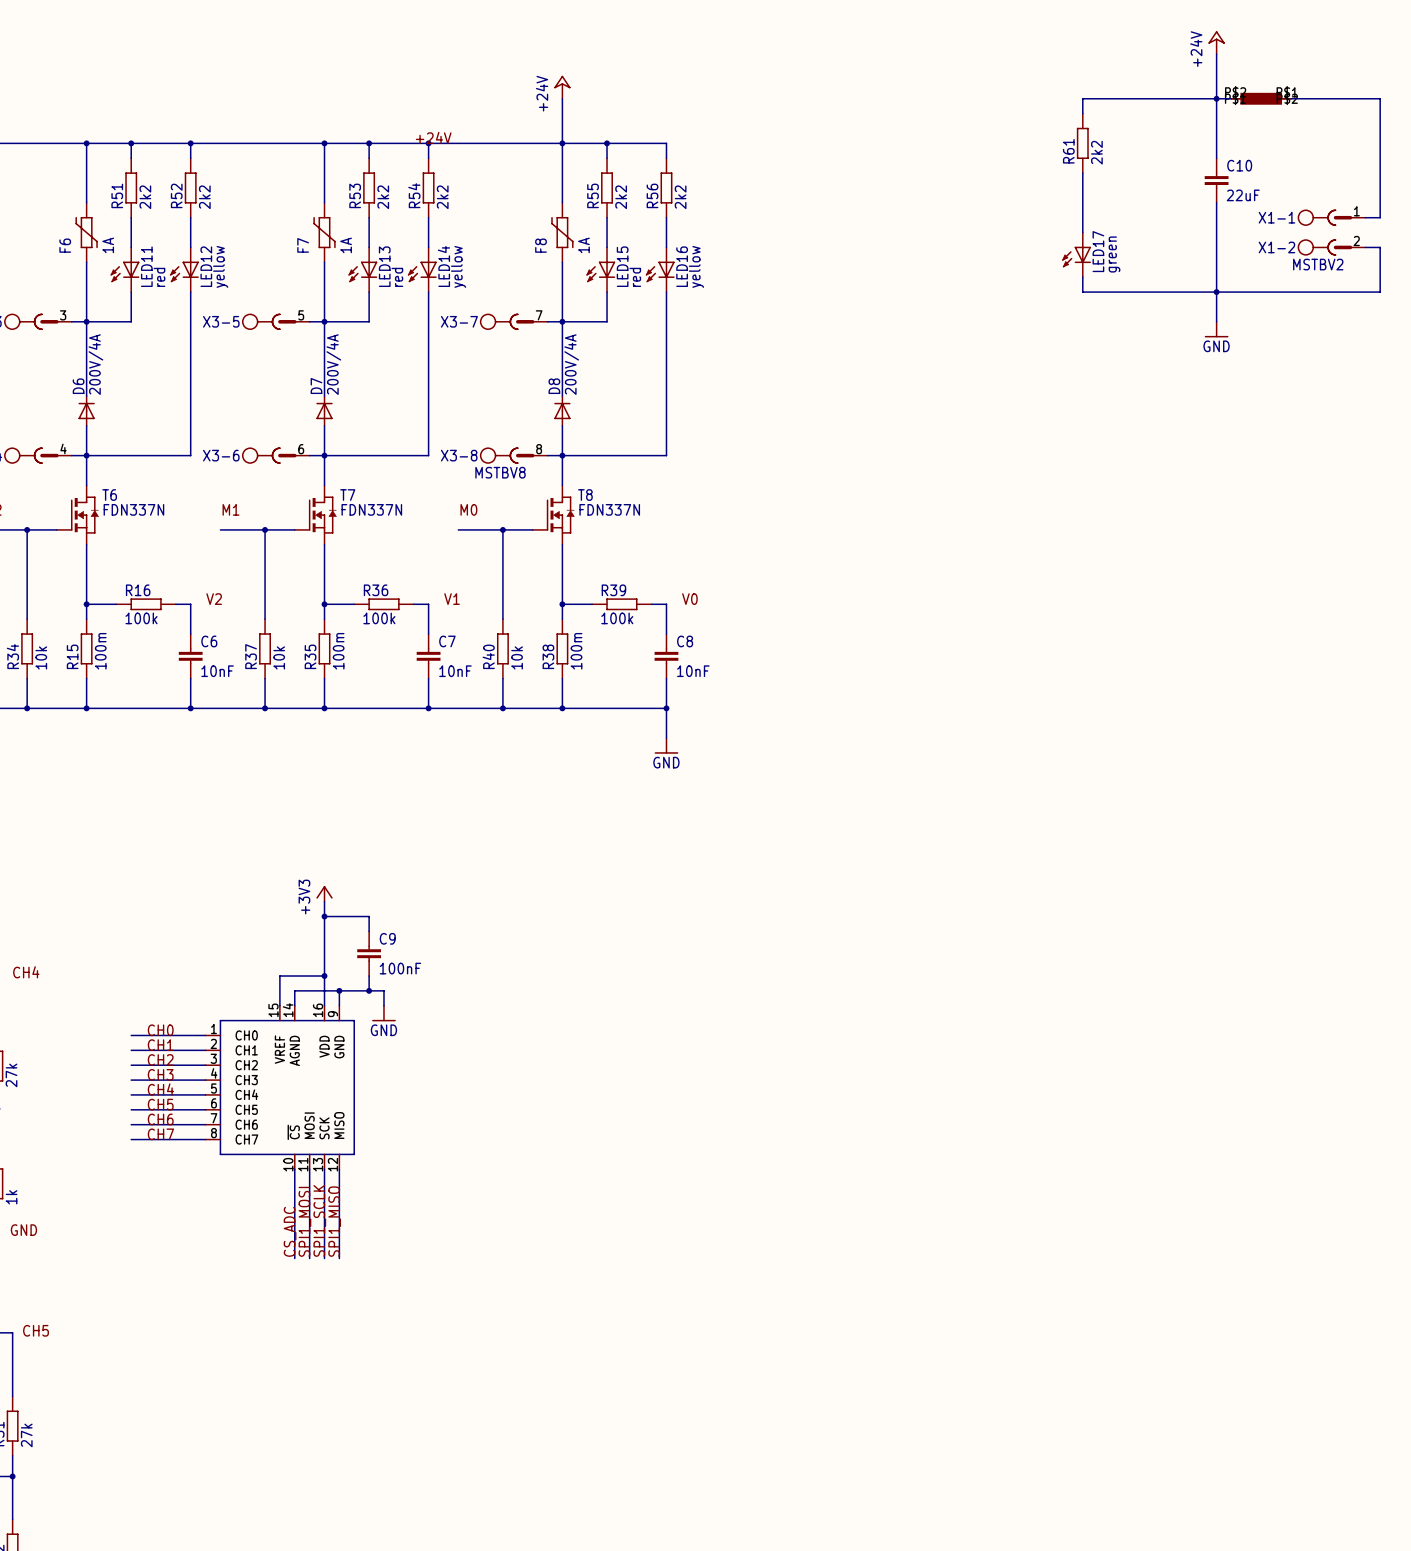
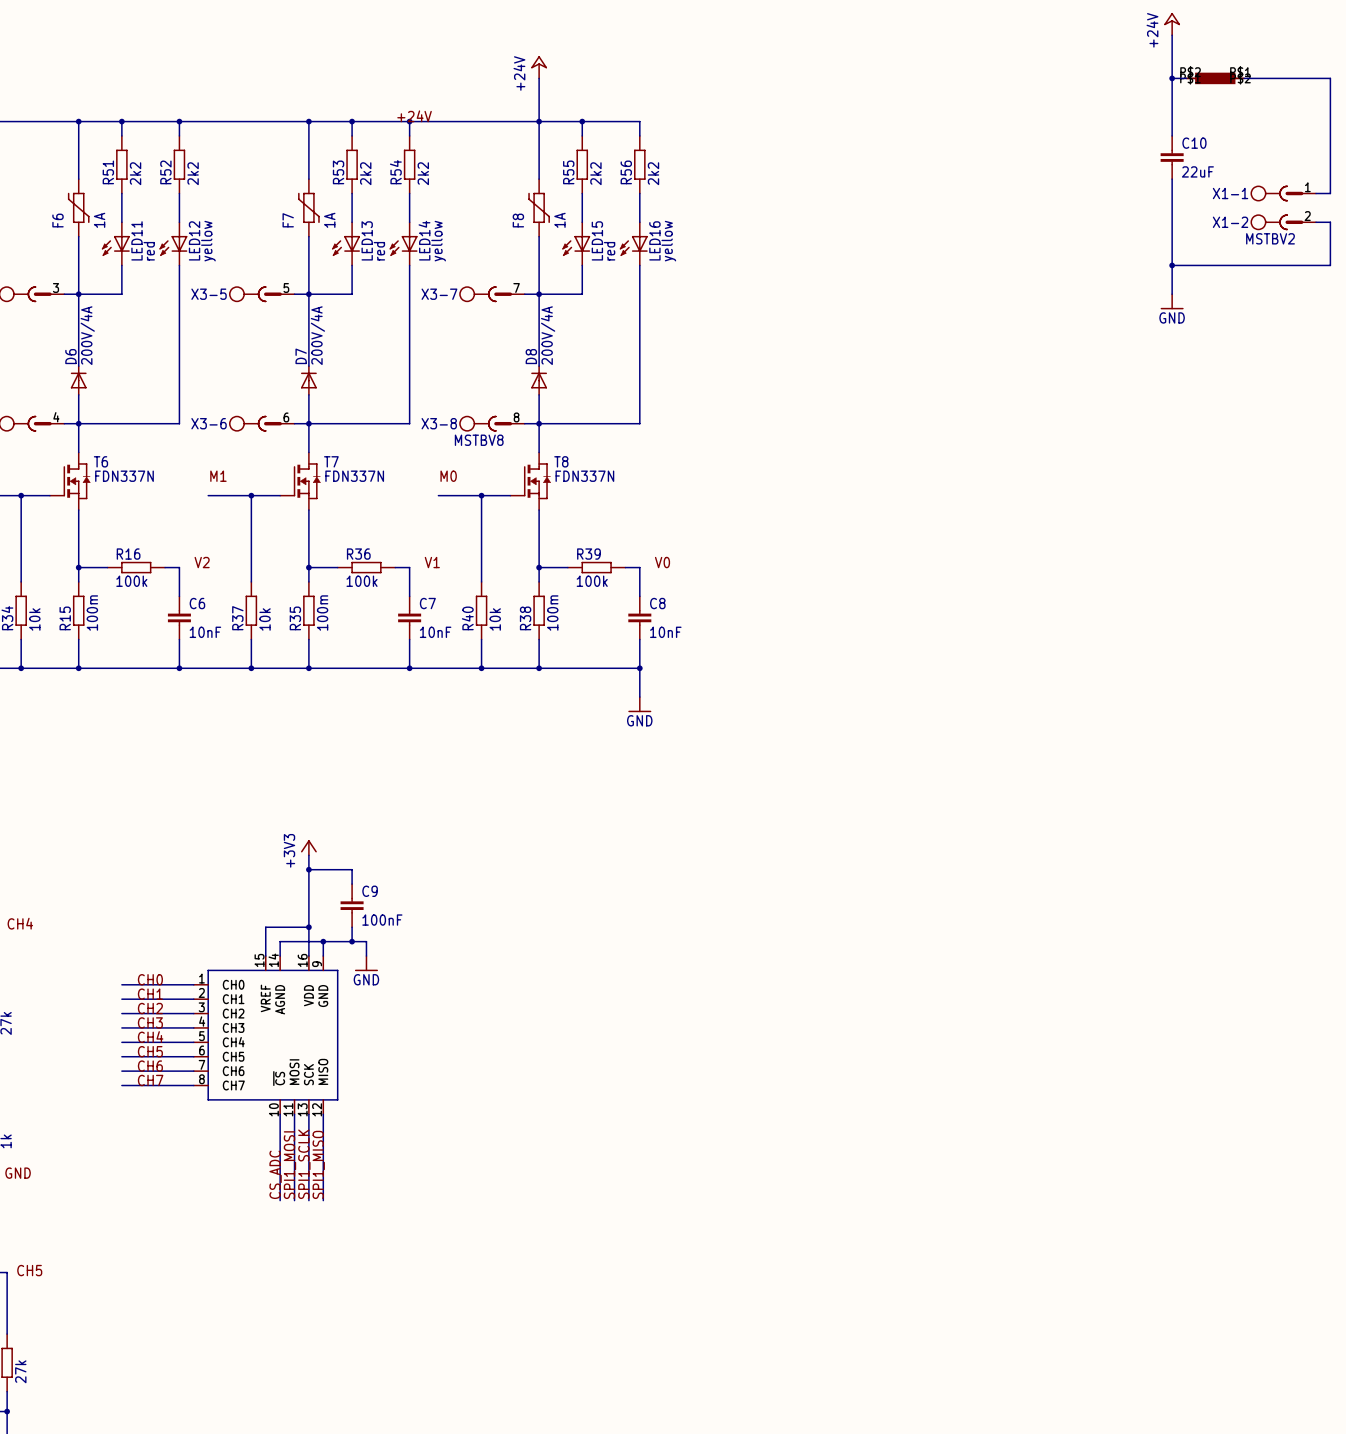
wire: (1216, 98) (1082, 98) (1082, 113) -> none
R61: 2k2 (1082, 143) -> none
wire: (1082, 173) (1082, 232) -> none
LED17: green (1076, 254) -> none
wire: (1082, 277) (1082, 292) (1216, 292) -> none

